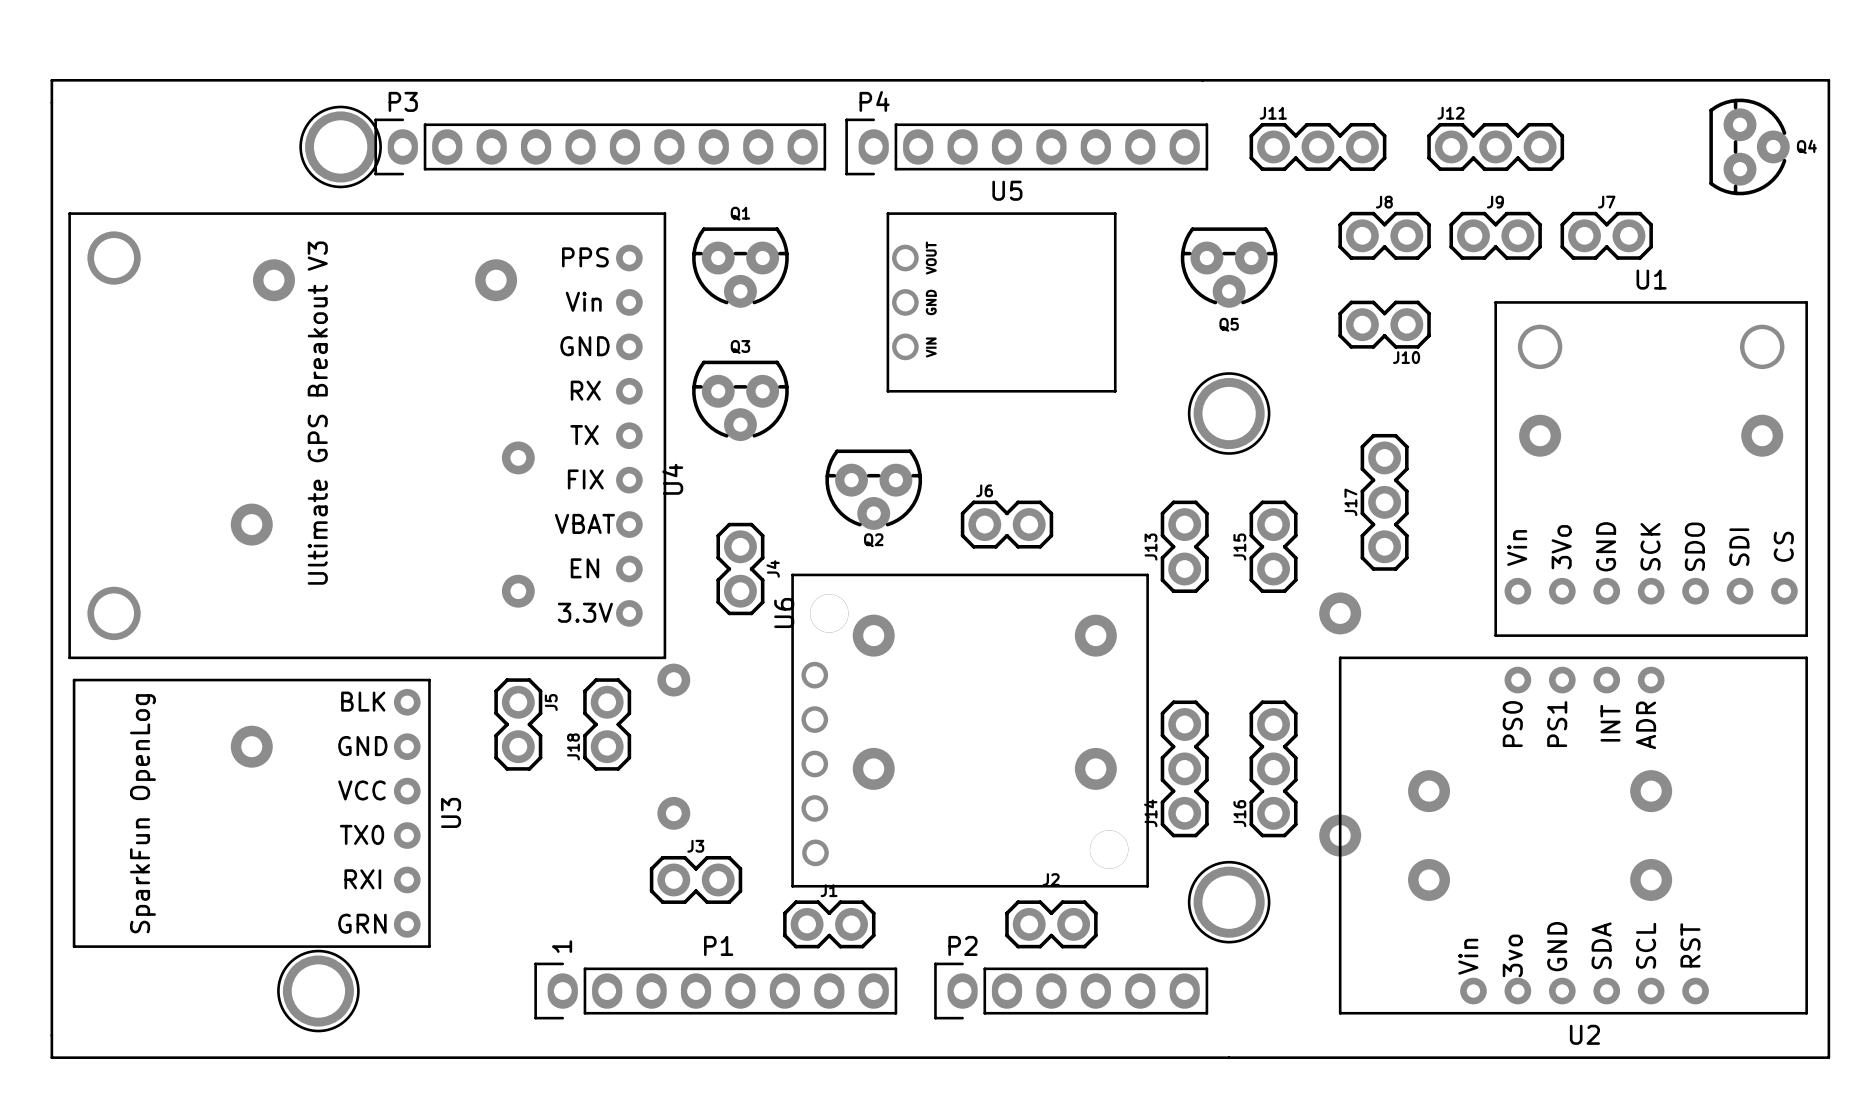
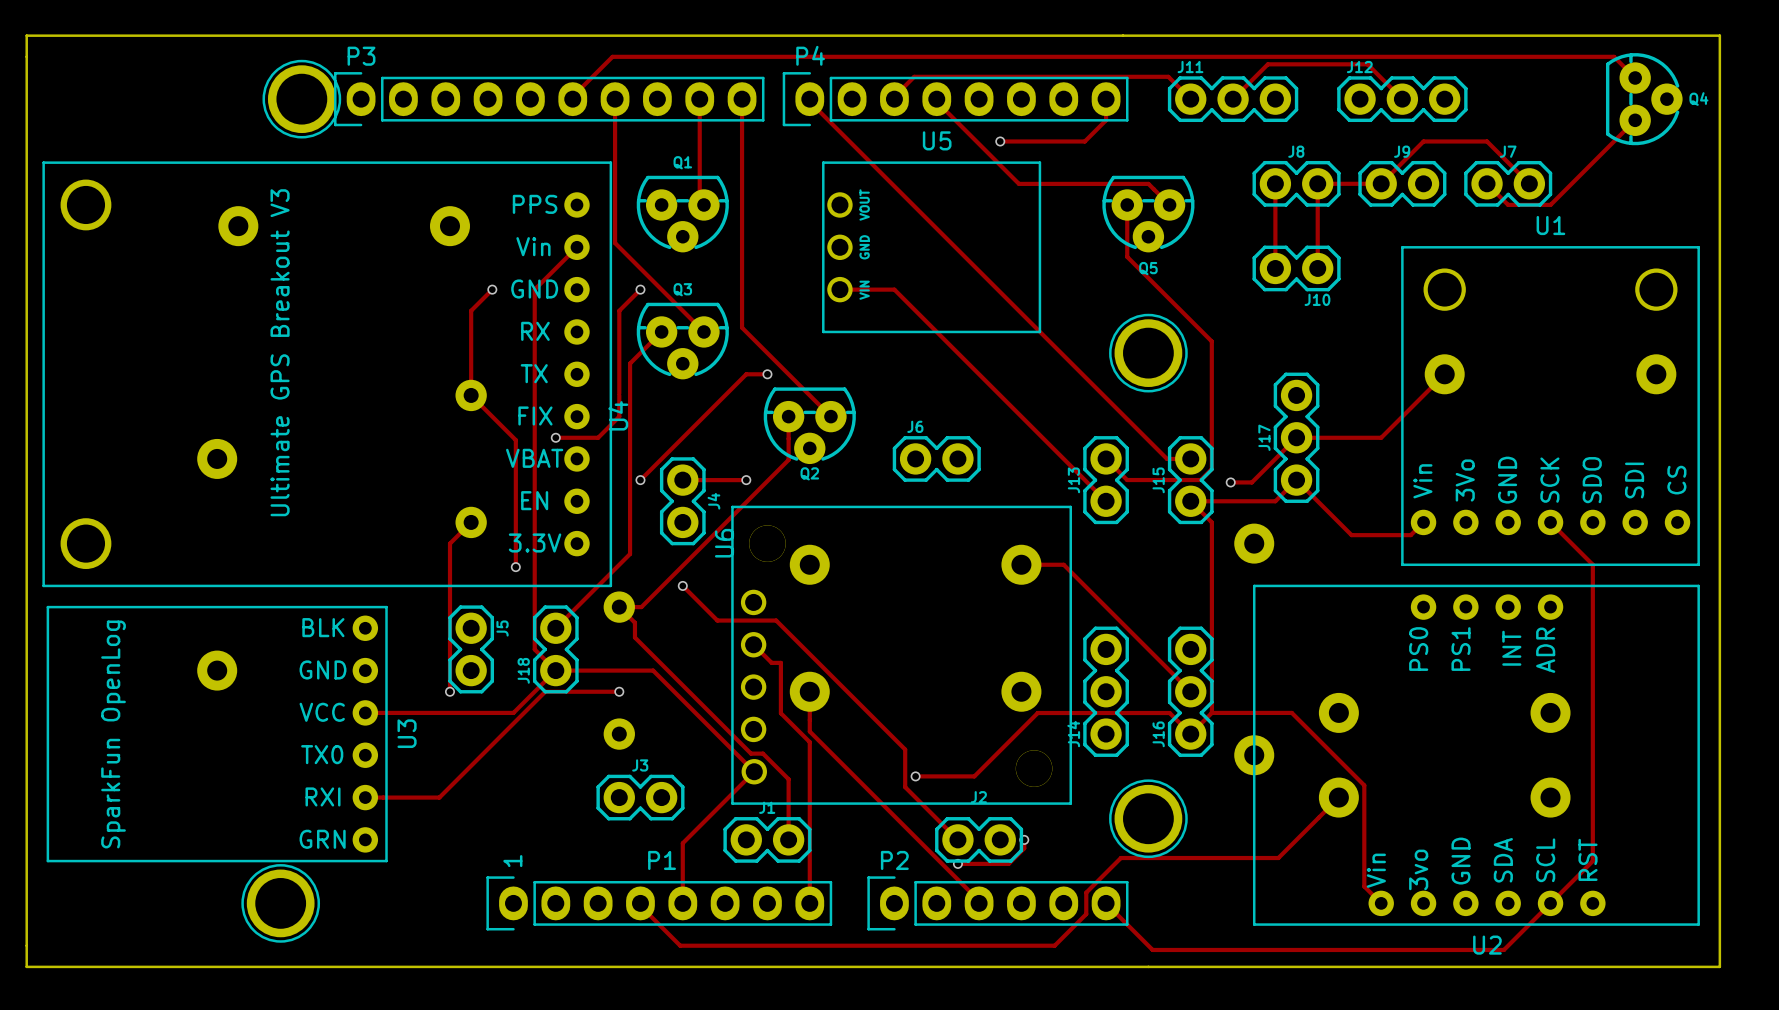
track: none -> (1635, 77) (1614, 56) (612, 56) (572, 96) (572, 99)
track: none -> (615, 99) (615, 243) (703, 331)
track: none -> (699, 99) (699, 200) (703, 204)
track: none -> (742, 99) (742, 327) (830, 416)
track: none -> (809, 99) (809, 101) (1167, 458) (1190, 458)
track: none -> (894, 99) (894, 96) (914, 76) (1168, 76) (1190, 99)
track: none -> (936, 99) (936, 101) (1018, 183) (1148, 183) (1169, 204)
track: none -> (1106, 99) (1106, 120) (1084, 141) (1000, 141)
track: none -> (1233, 99) (1267, 64) (1367, 64) (1402, 99)
track: none -> (1635, 120) (1550, 204) (1508, 204) (1487, 183)
via: none -> (1000, 141)
track: none -> (1275, 183) (1275, 268)
track: none -> (1529, 183) (1487, 141) (1423, 141) (1381, 183) (1317, 183) (1317, 268)
track: none -> (1127, 204) (1127, 256) (1211, 341) (1211, 469) (1200, 480) (1127, 480) (1106, 458)
track: none -> (576, 247) (534, 289) (534, 649) (555, 670)
track: none -> (492, 289) (471, 310) (471, 395) (515, 440) (515, 567)
via: none -> (492, 289)
track: none -> (640, 289) (619, 310) (619, 393)
via: none -> (640, 289)
track: none -> (839, 289) (894, 289) (1106, 501)
track: none -> (661, 331) (630, 363) (630, 554) (555, 628)
track: none -> (767, 374) (746, 374) (640, 480)
via: none -> (767, 374)
track: none -> (1444, 374) (1381, 437) (1296, 437) (1251, 482) (1230, 482)
track: none -> (619, 395) (619, 416) (598, 437) (555, 437)
track: none -> (788, 416) (788, 459) (641, 607) (619, 607) (634, 622) (634, 637) (751, 753) (762, 753) (788, 779) (788, 839)
via: none -> (555, 437)
via: none -> (640, 480)
track: none -> (682, 480) (746, 480)
via: none -> (746, 480)
via: none -> (1230, 482)
track: none -> (471, 522) (449, 543) (449, 691)
track: none -> (1423, 522) (1410, 535) (1351, 535) (1296, 480) (1275, 501) (1190, 501) (1211, 522) (1211, 712)
track: none -> (1550, 522) (1592, 564) (1592, 861) (1503, 949) (1152, 949) (1106, 903)
track: none -> (1021, 564) (1063, 564) (1190, 691)
via: none -> (515, 567)
track: none -> (682, 585) (717, 620) (776, 620) (905, 749) (905, 787) (957, 839)
via: none -> (682, 585)
track: none -> (753, 644) (771, 662) (780, 662) (780, 713) (809, 742) (809, 903)
track: none -> (555, 670) (513, 712) (365, 712)
track: none -> (555, 670) (653, 670) (754, 771) (682, 843) (682, 903)
via: none -> (449, 691)
track: none -> (619, 691) (545, 691) (439, 797) (365, 797)
via: none -> (619, 691)
track: none -> (809, 691) (809, 731) (979, 900) (979, 903)
track: none -> (1211, 712) (1291, 712) (1364, 785) (1364, 886) (1381, 903)
track: none -> (1211, 712) (1190, 734) (1169, 713) (1037, 713) (974, 776) (915, 776)
via: none -> (915, 776)
track: none -> (1338, 797) (1278, 858) (1120, 858) (1086, 892) (1086, 914) (1054, 945) (680, 945) (640, 905) (640, 903)
track: none -> (1024, 839) (1024, 848) (1008, 863) (957, 863)
via: none -> (1024, 839)
via: none -> (957, 863)

